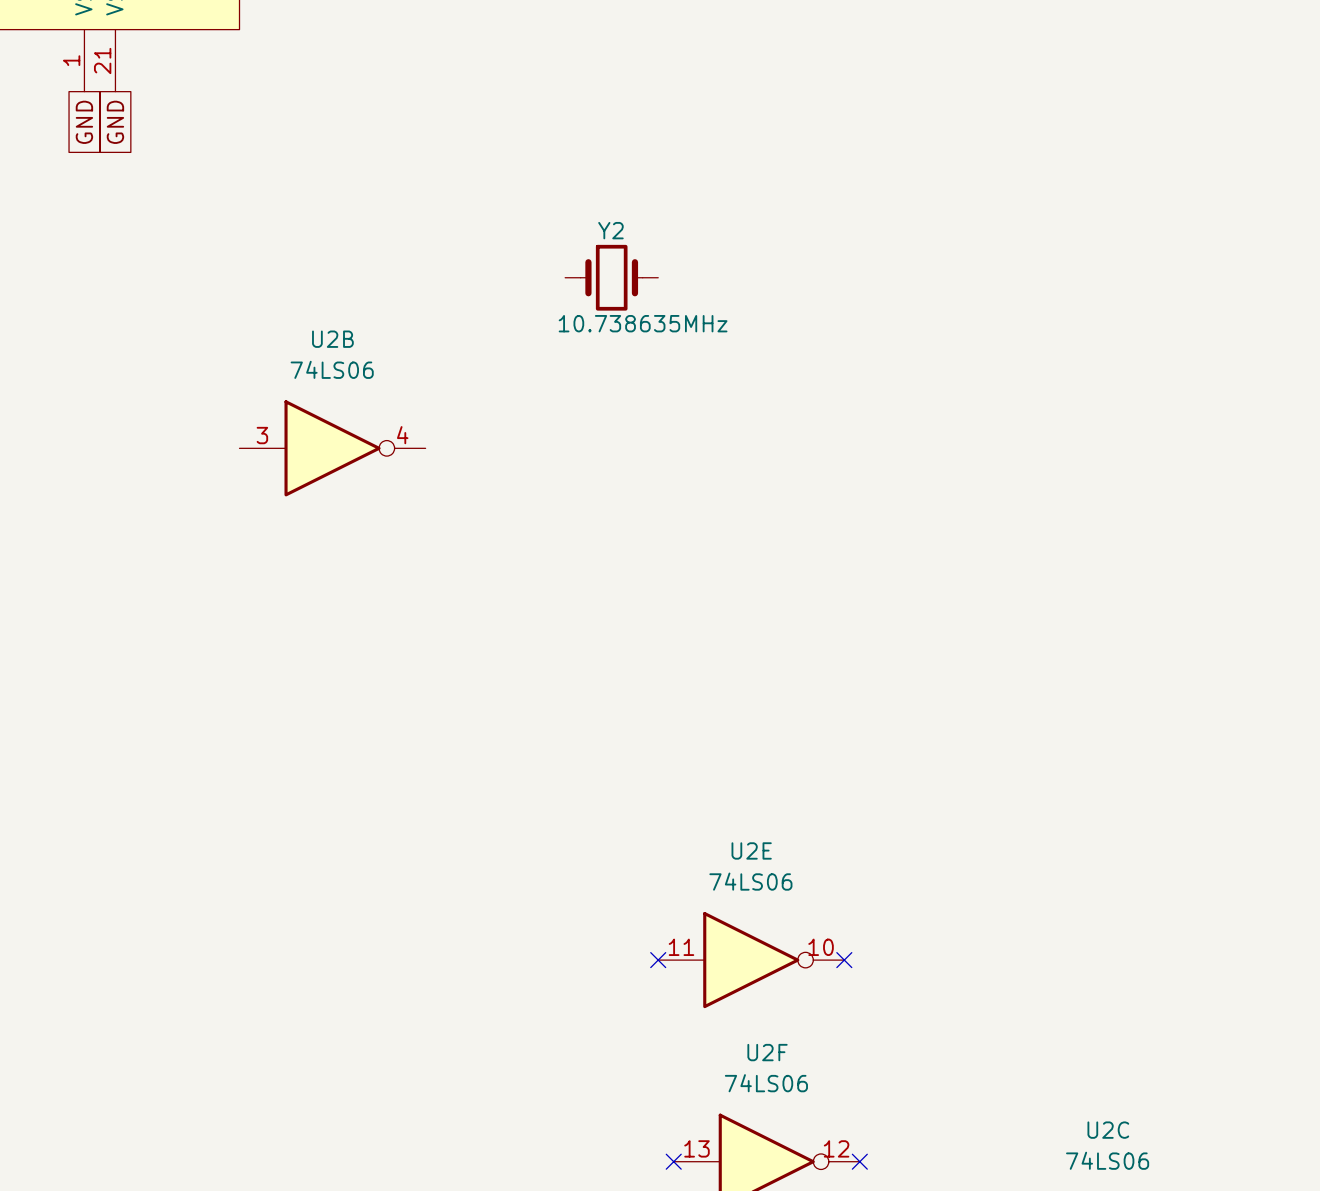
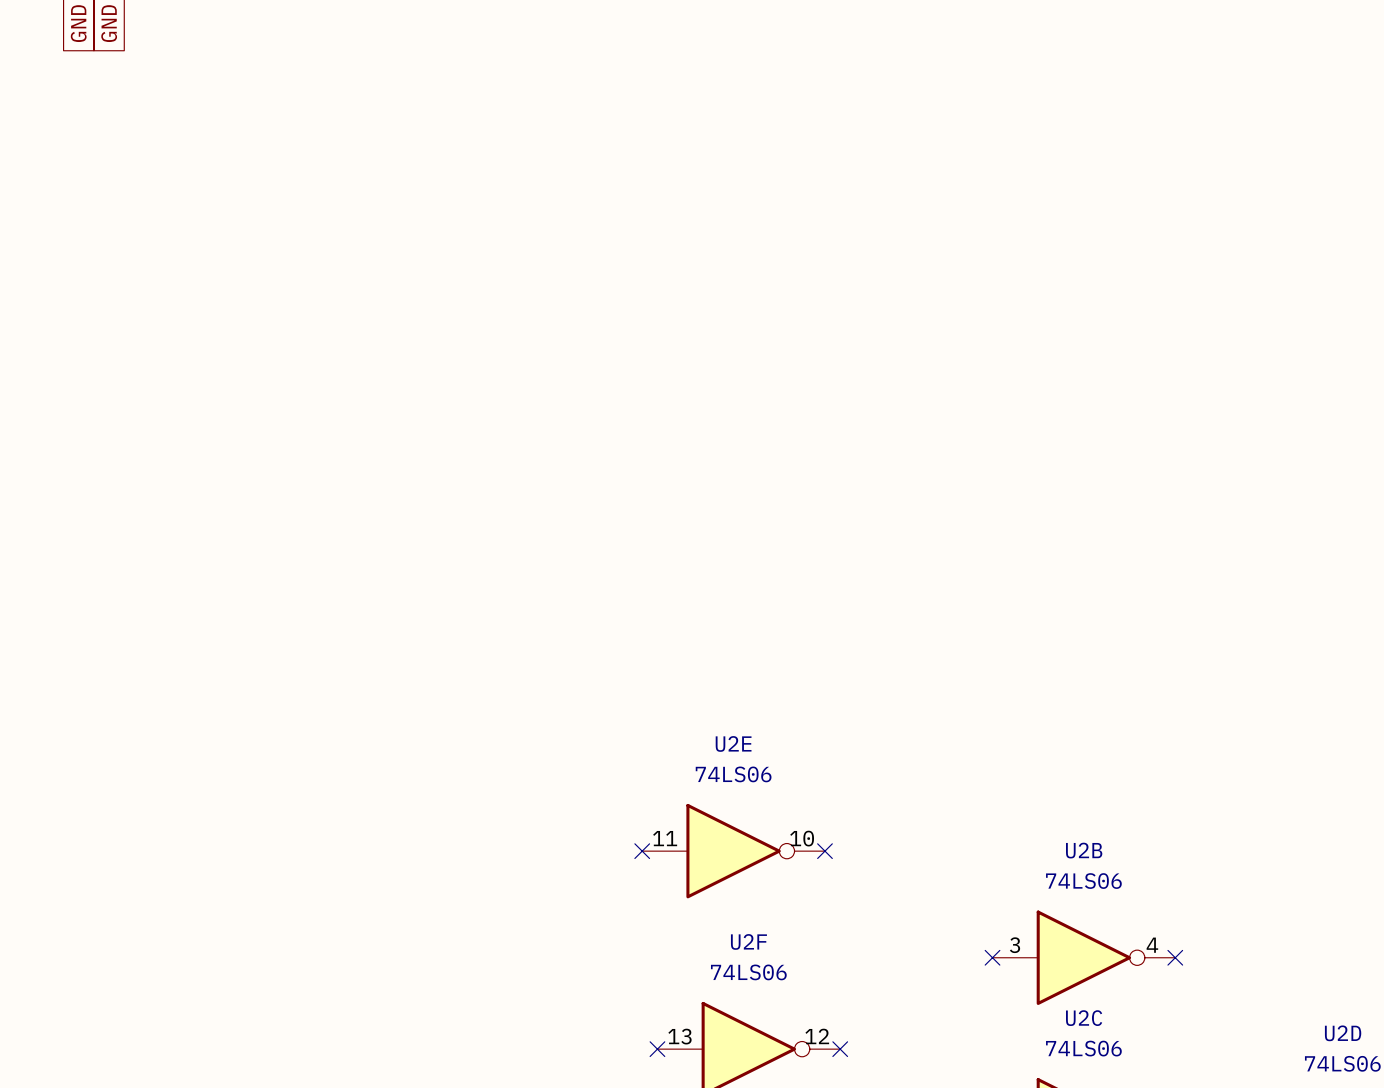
Y2: 10.738635MHz (611, 277) -> none
U2B position: (332, 448) -> (1083, 957)
no-connect mark: none -> (992, 957)
no-connect mark: none -> (1175, 957)

